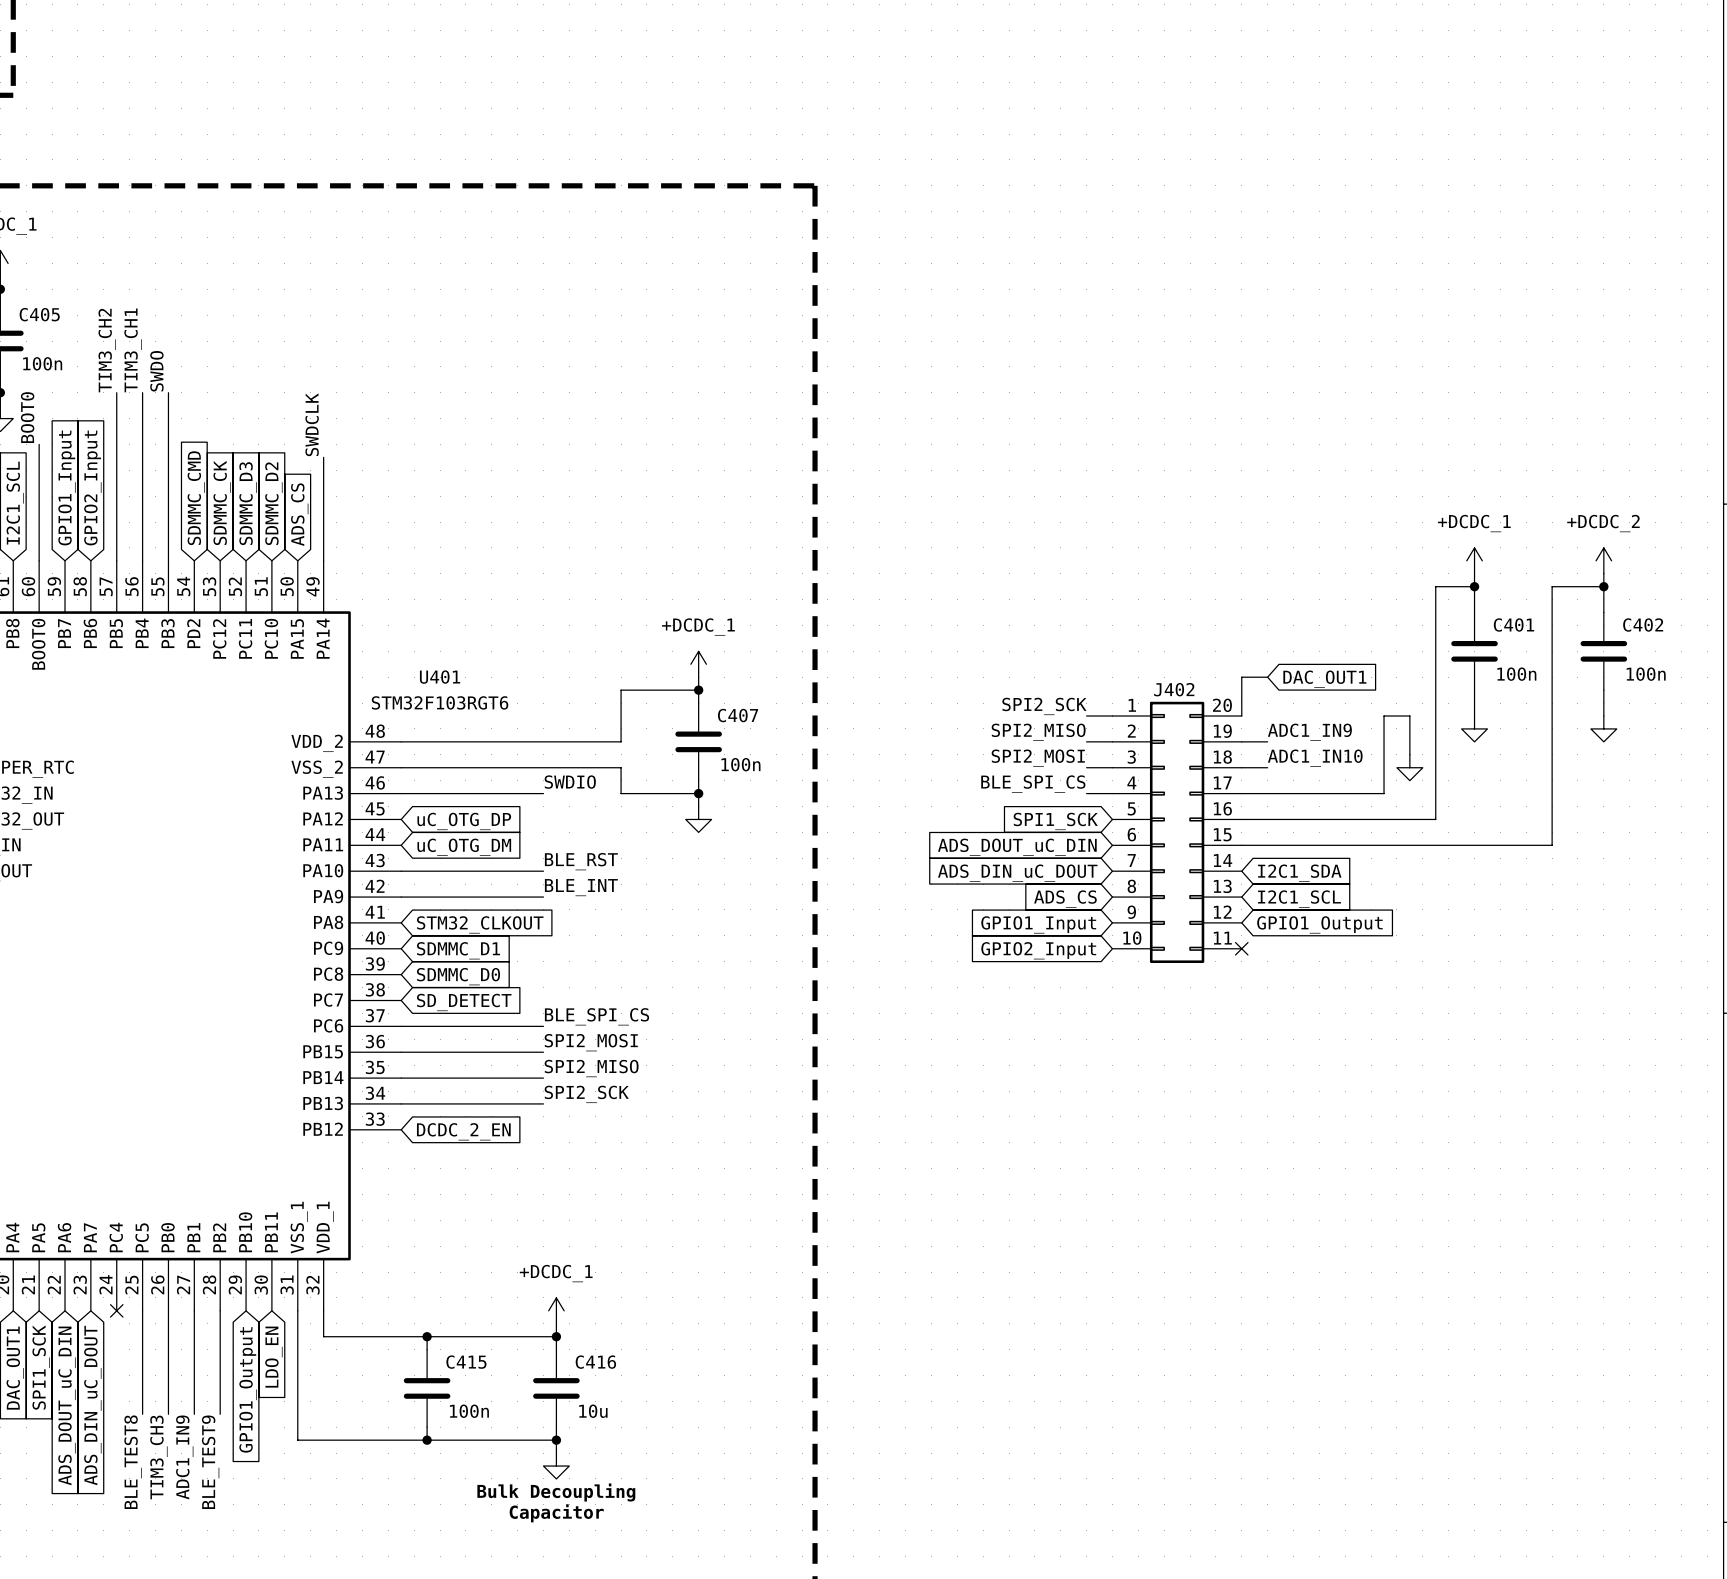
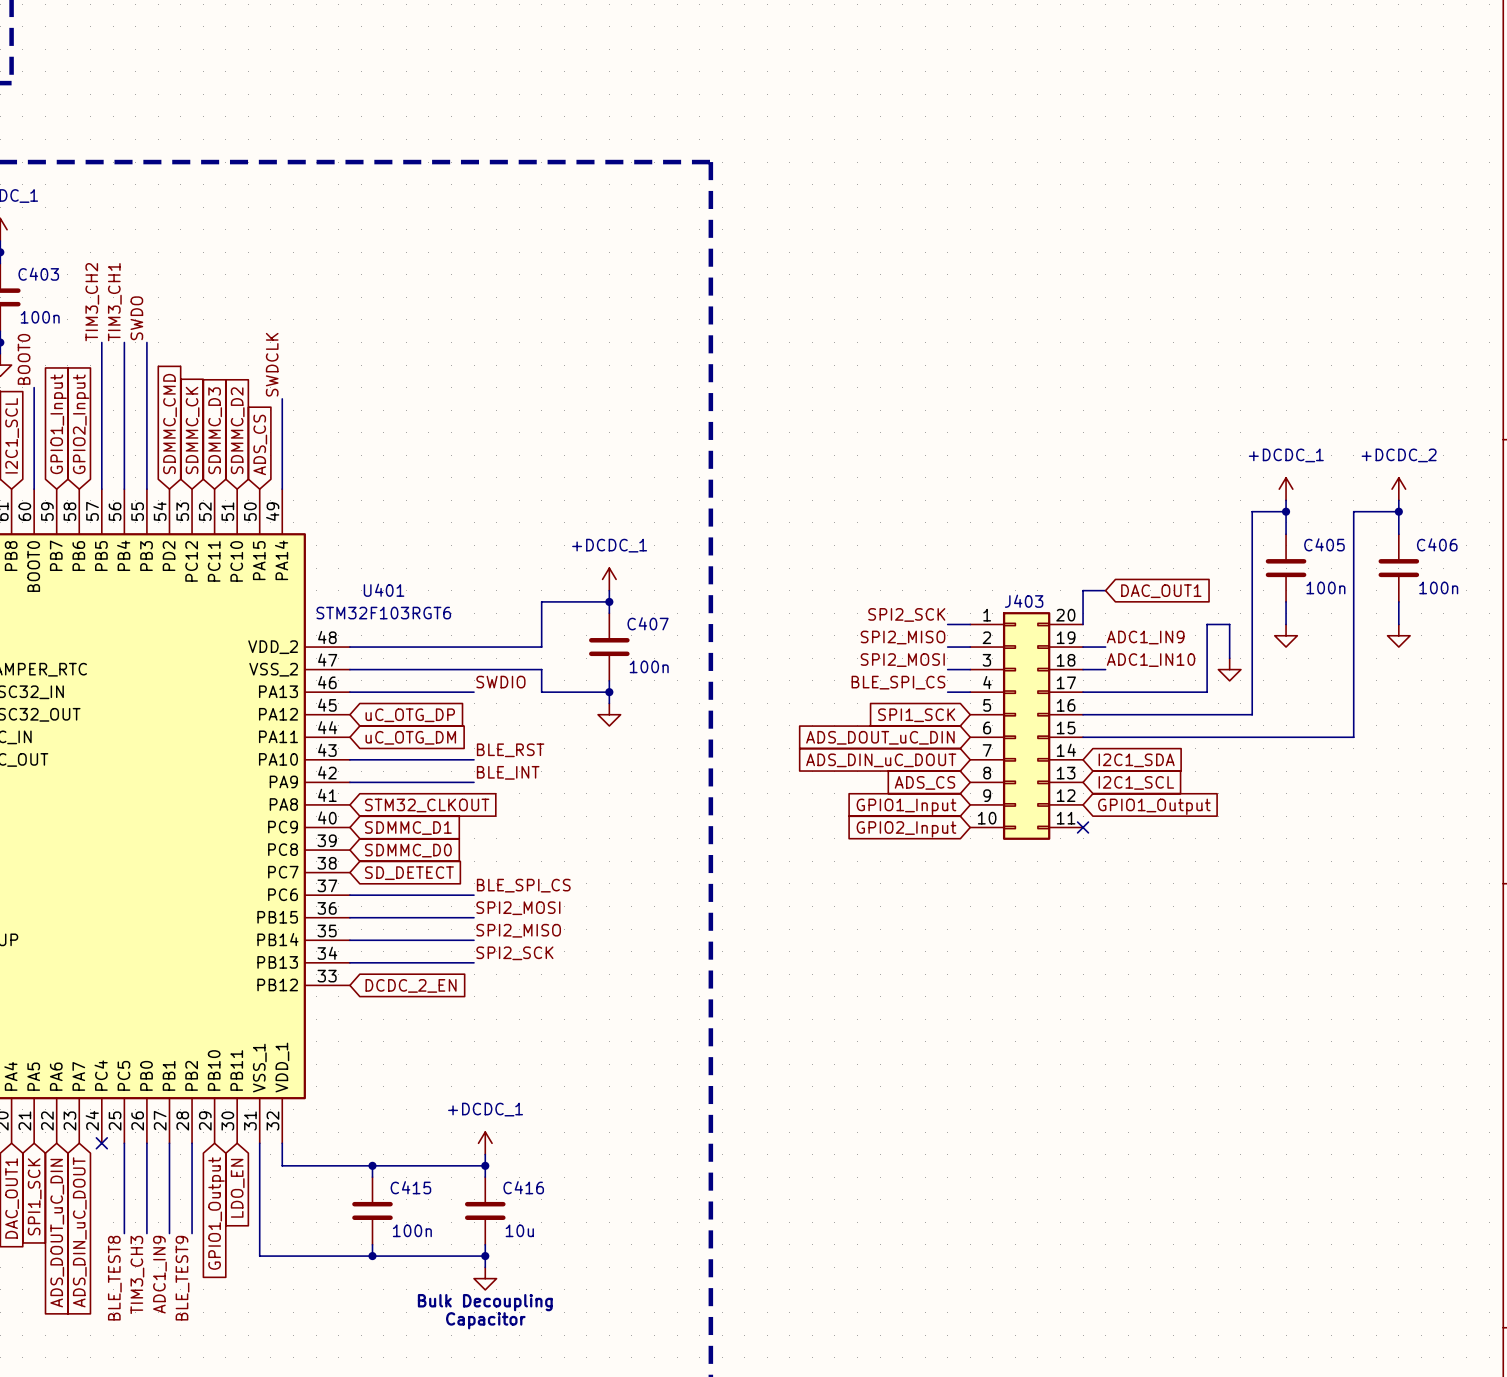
C405 name: C405 (39, 314) -> C403 (38, 274)
C401 name: C401 (1513, 625) -> C405 (1324, 544)
C402 name: C402 (1643, 625) -> C406 (1437, 544)
J402 name: J402 (1174, 689) -> J403 (1024, 601)

